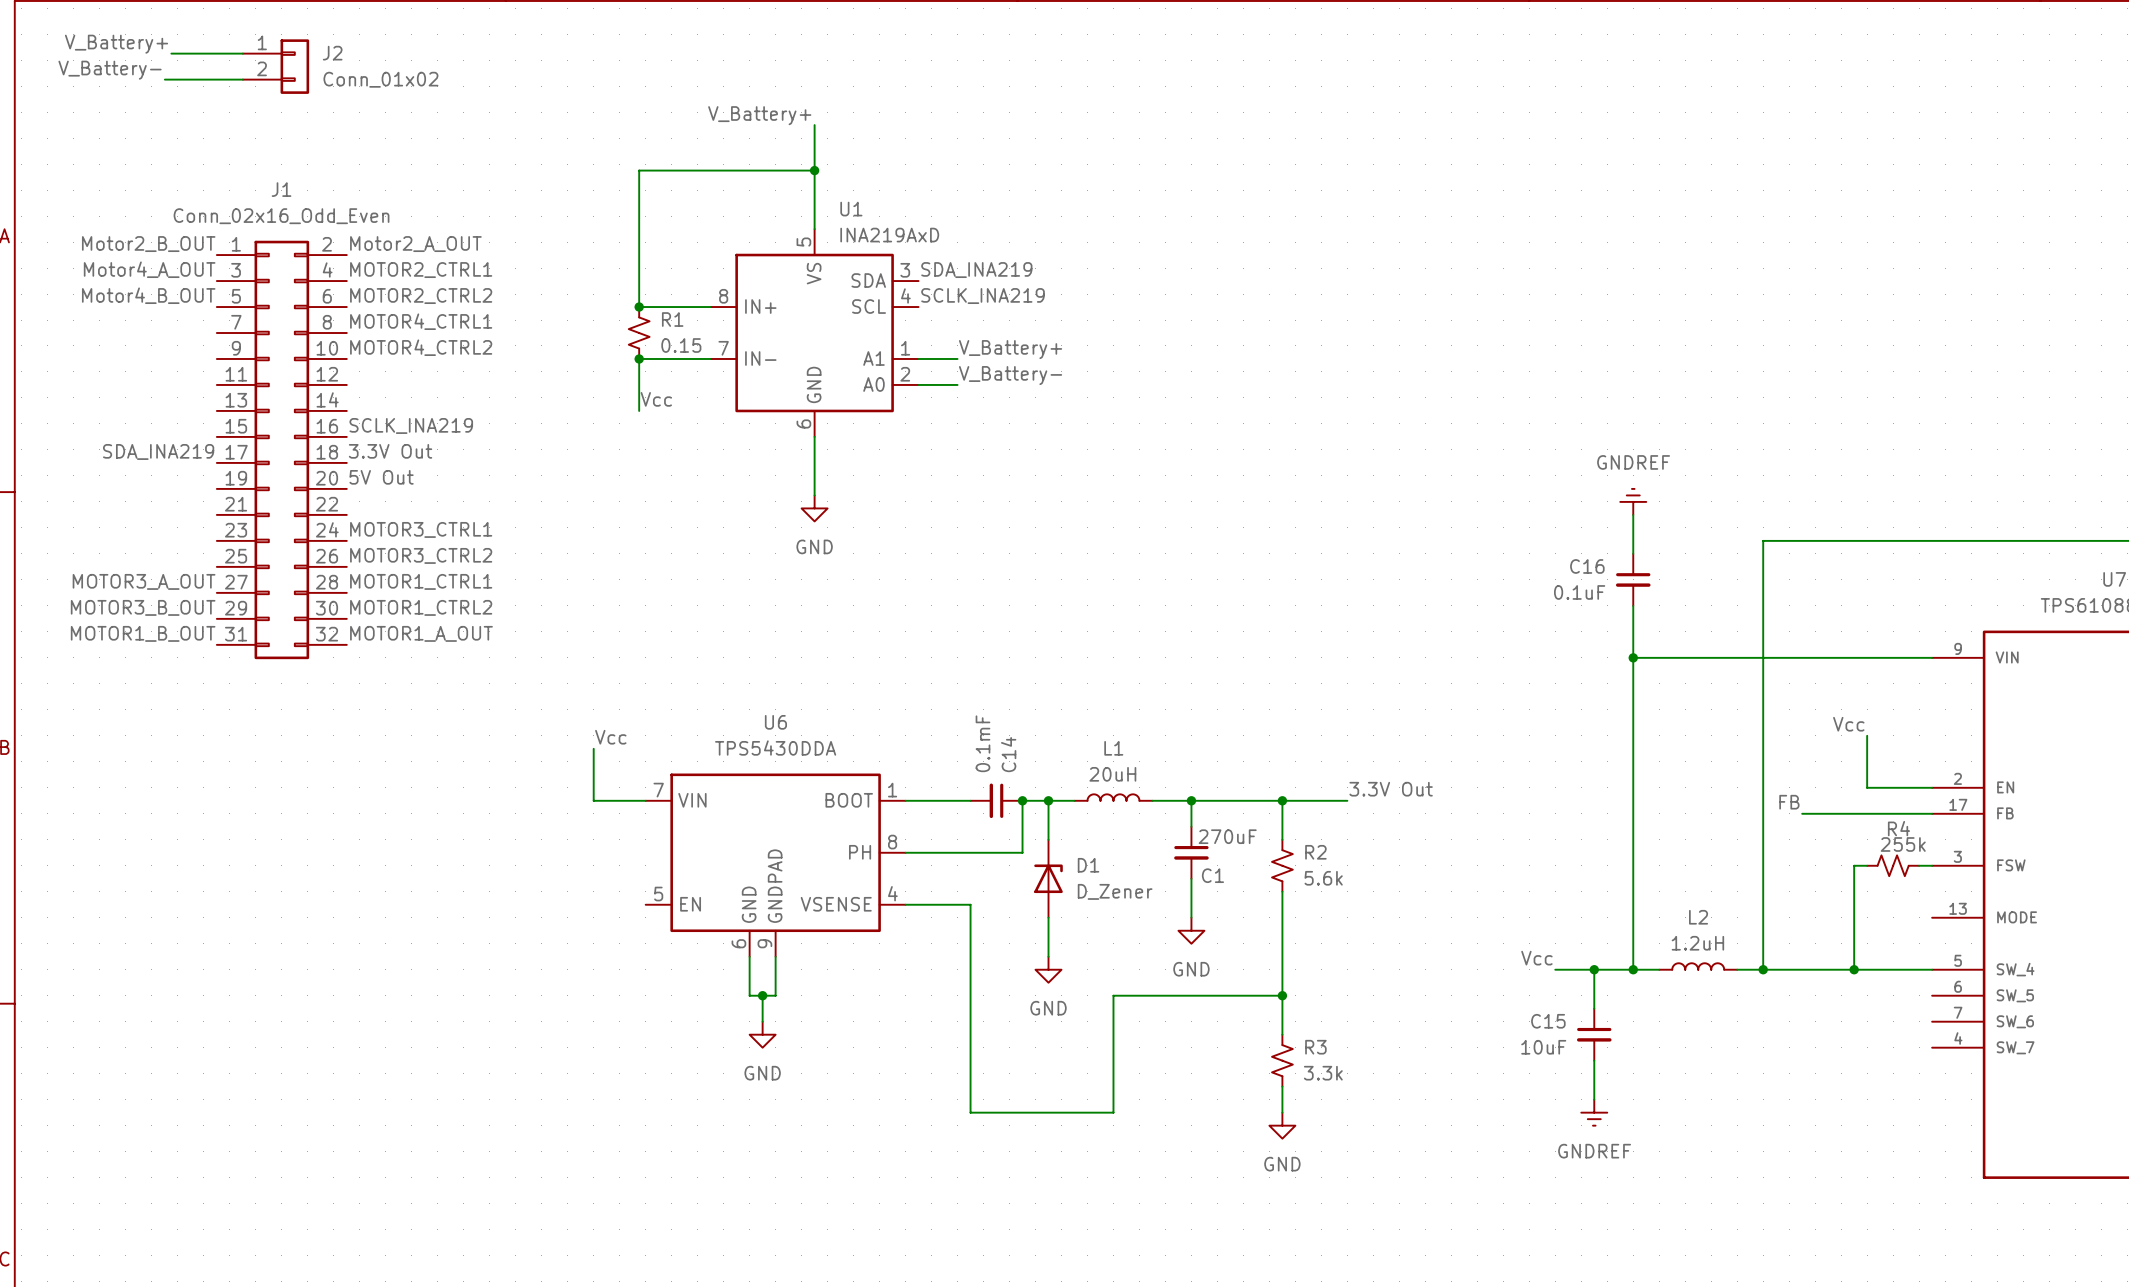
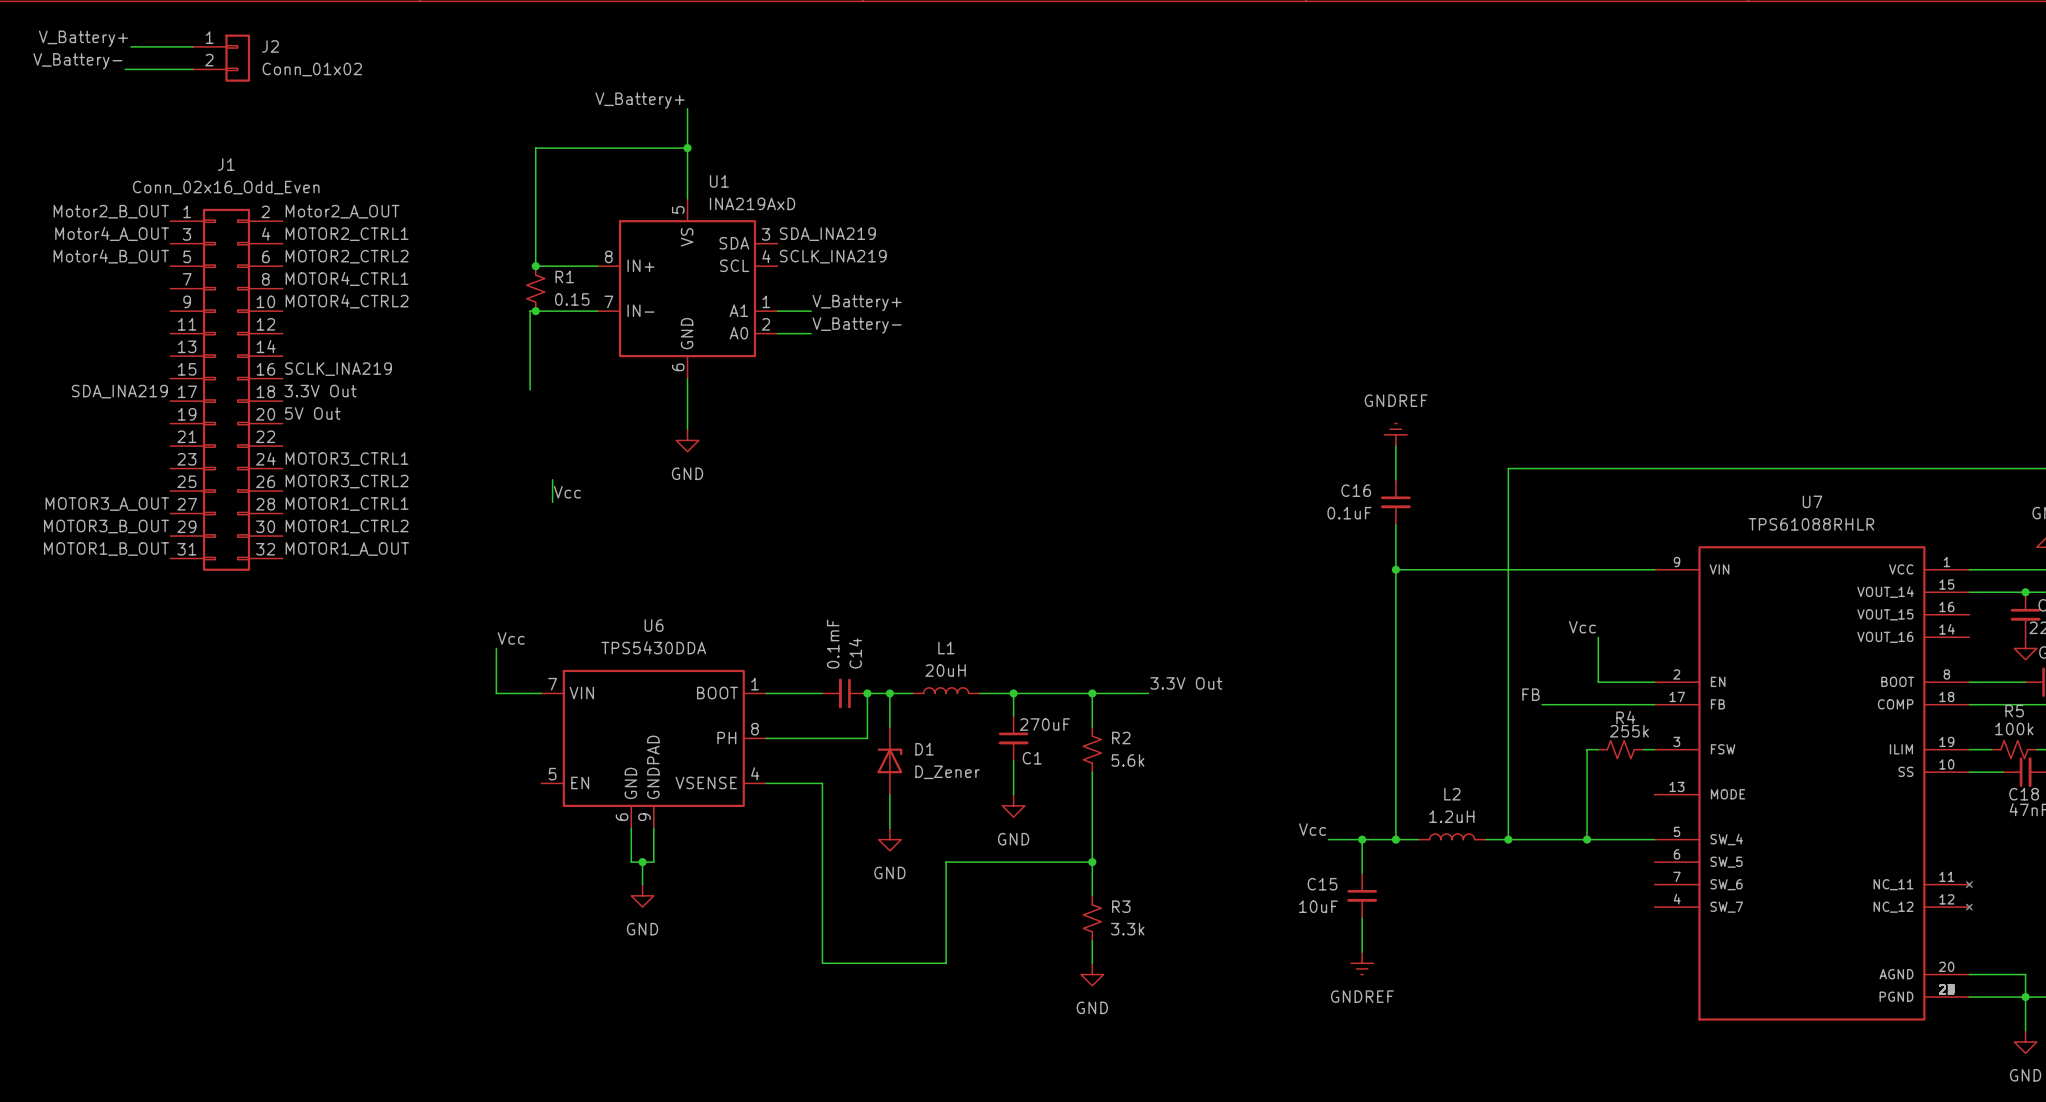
wire: (639, 358) (639, 410) -> (535, 311) (530, 311) (530, 389)
label position: Vcc (656, 399) -> Vcc (567, 492)
wire: none -> (552, 479) (552, 502)

